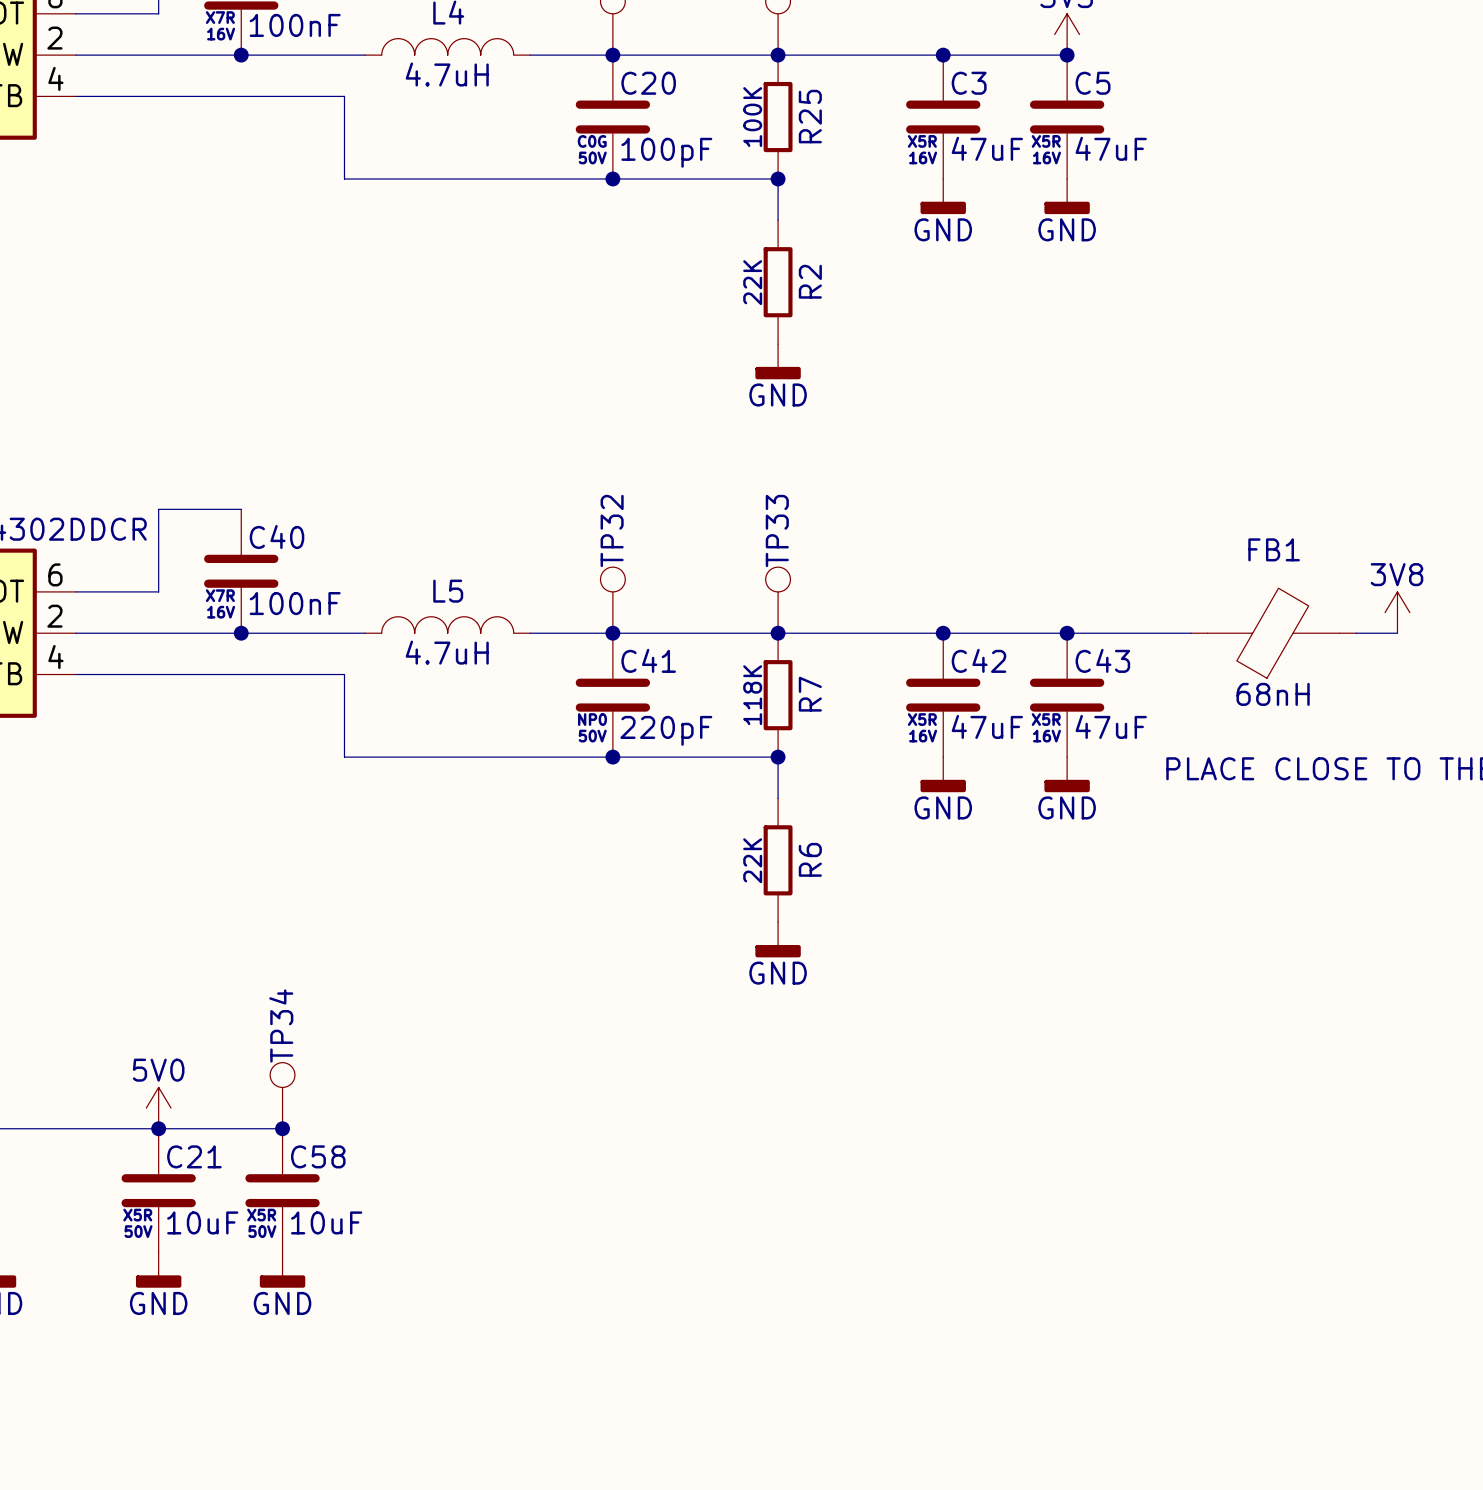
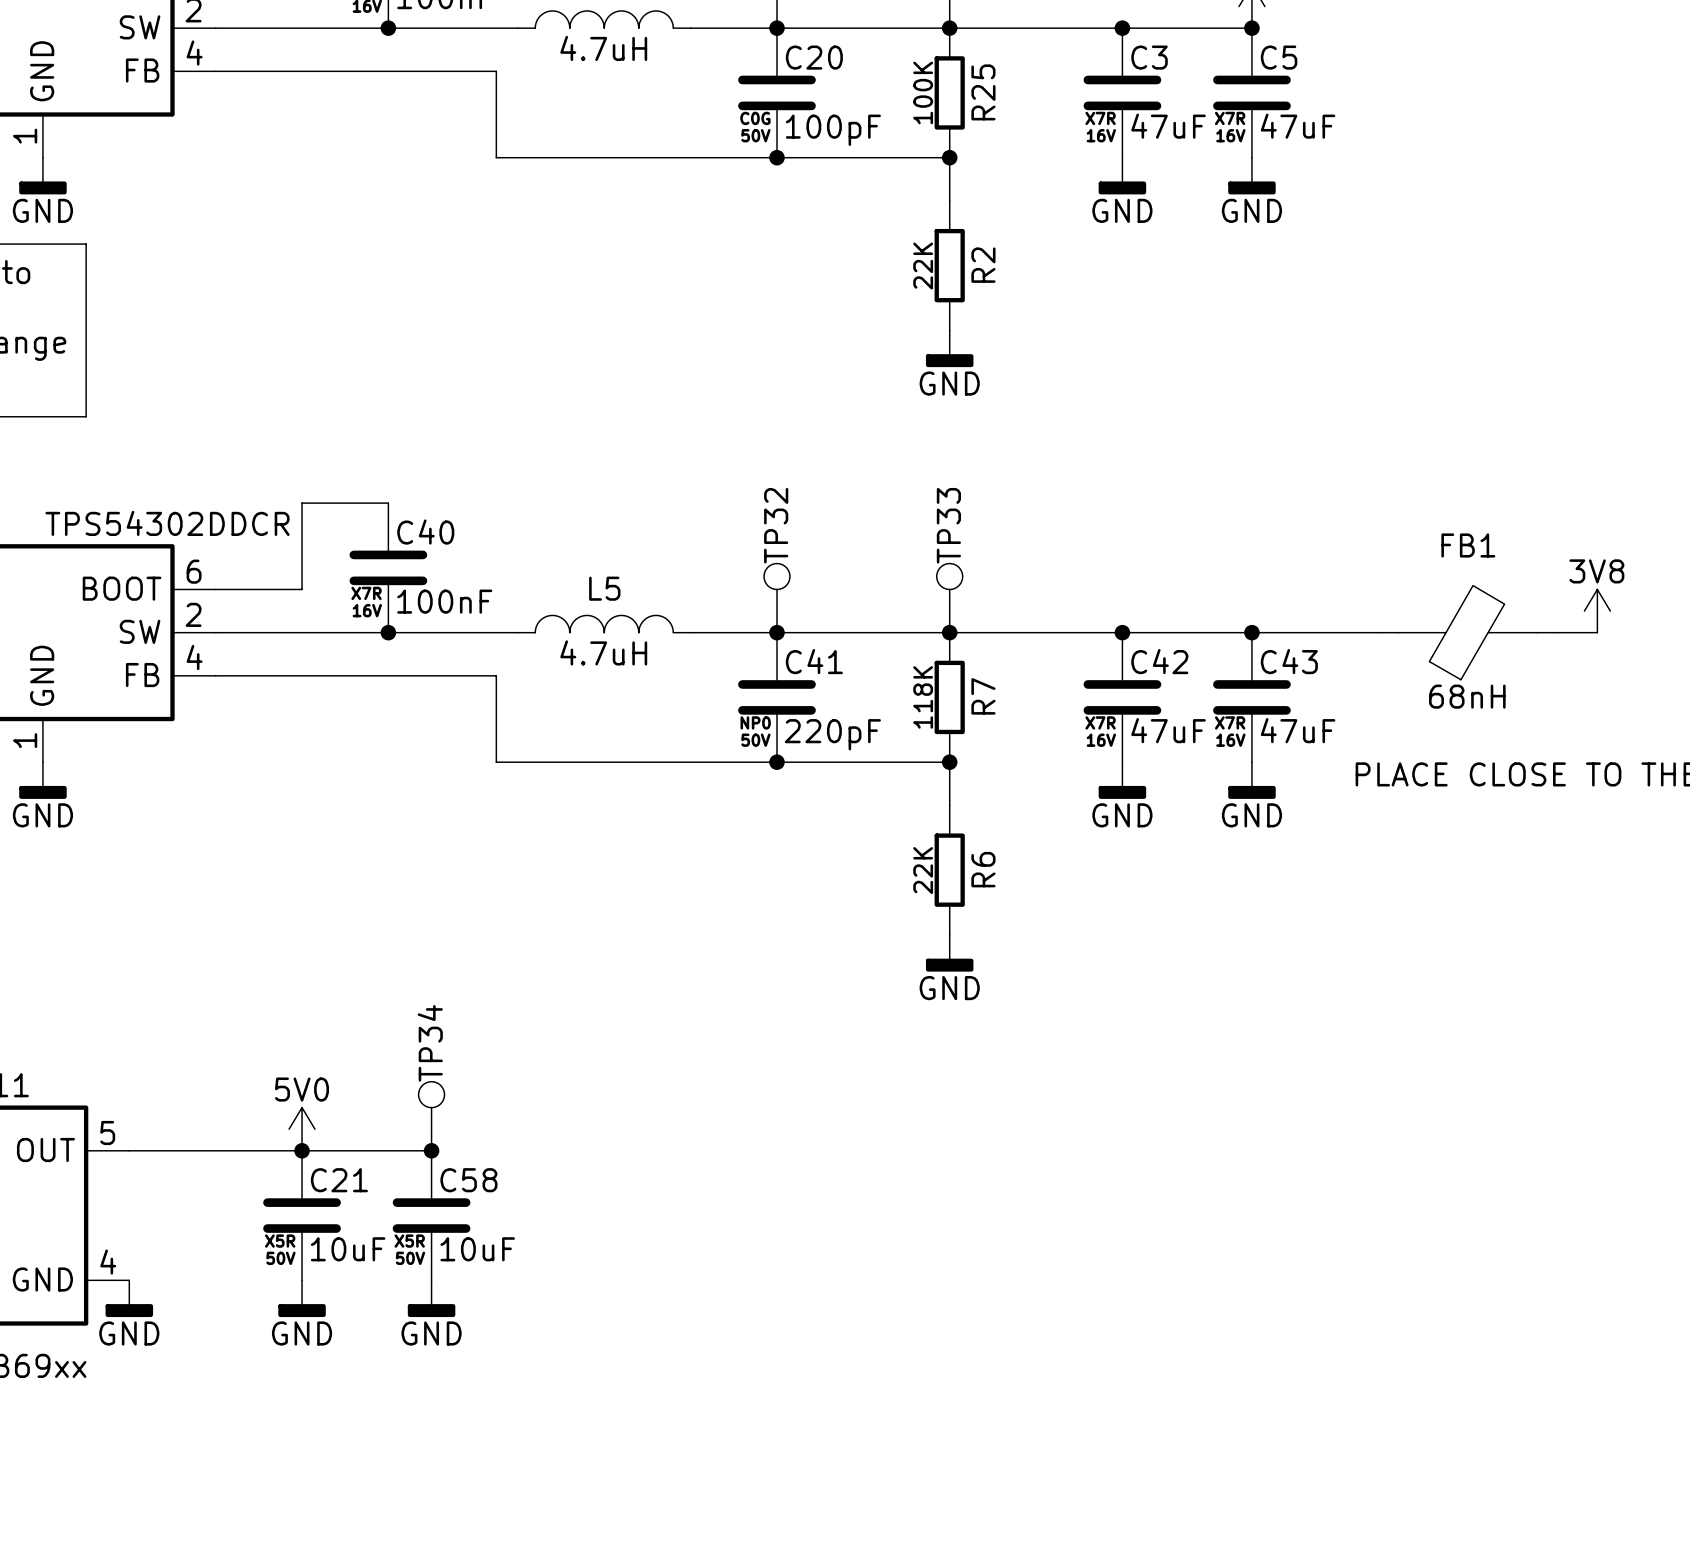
C3 text: X5R (922, 141) -> X7R (1100, 118)
C5 text: X5R (1046, 141) -> X7R (1230, 118)
C42 text: X5R (922, 719) -> X7R (1100, 722)
C43 text: X5R (1046, 719) -> X7R (1230, 722)

